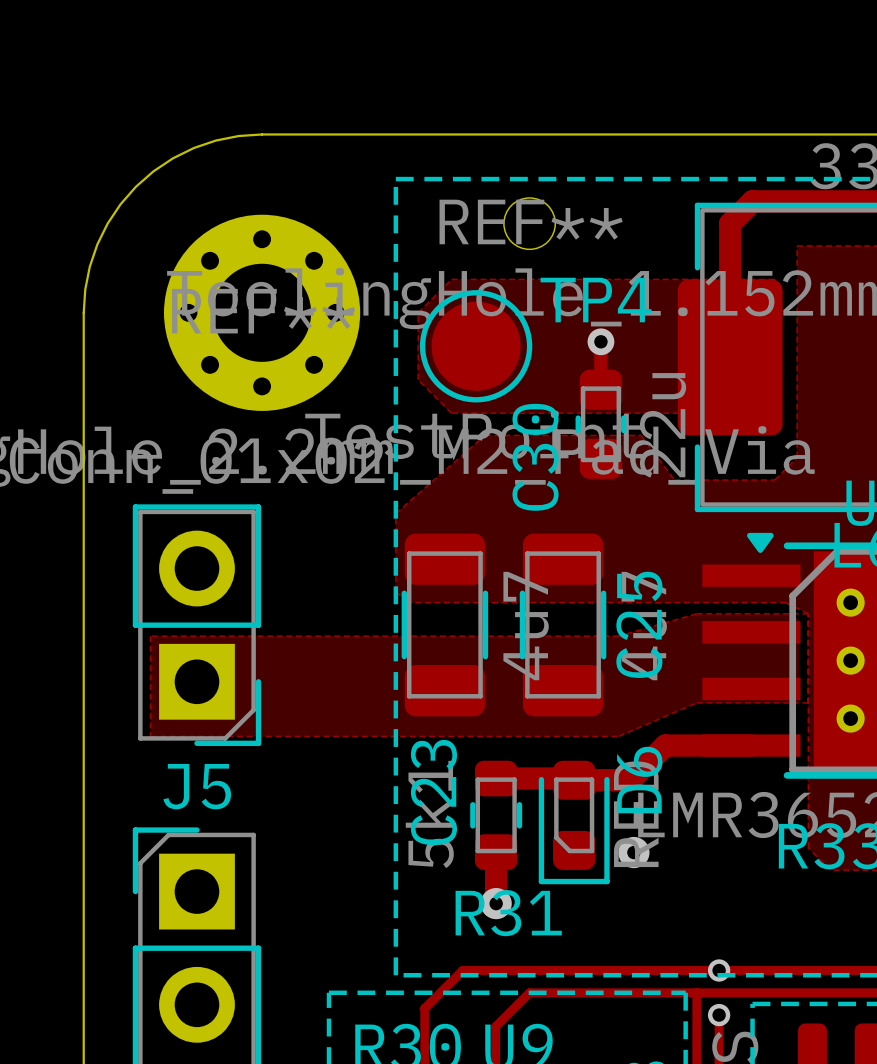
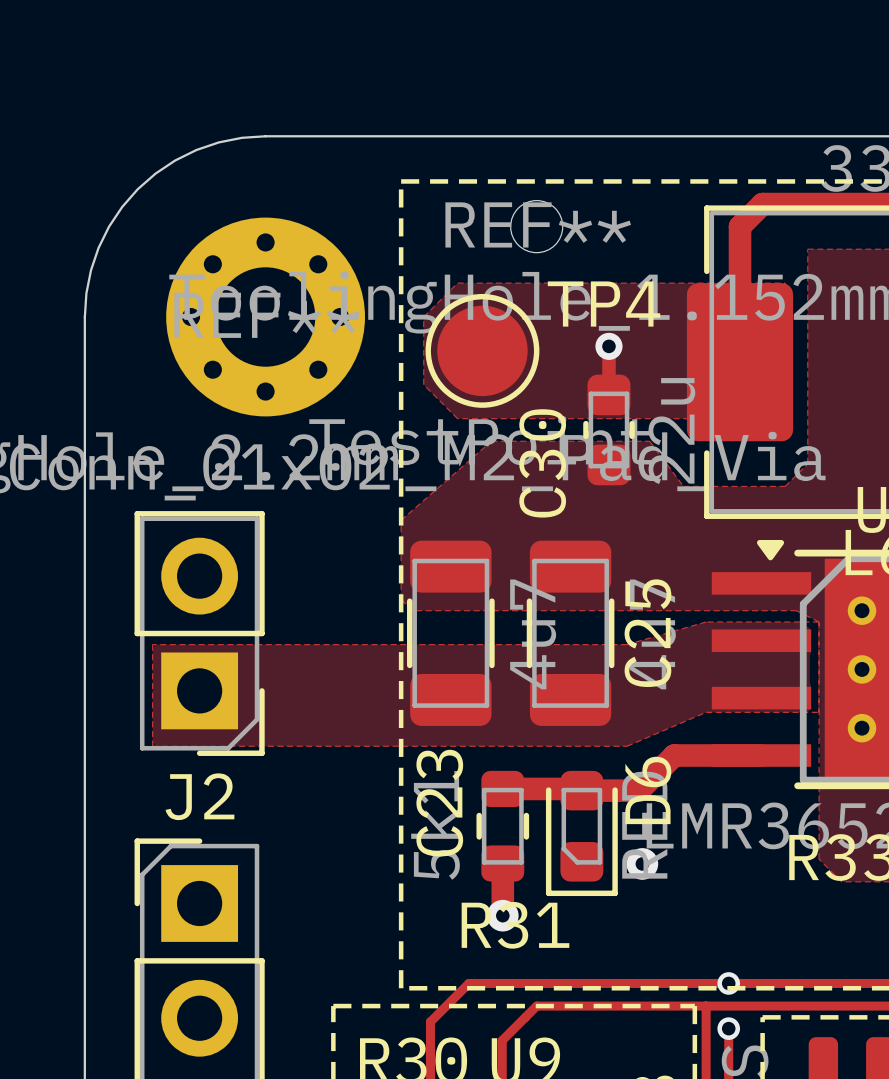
J5 name: J5 (197, 786) -> J2 (199, 796)

